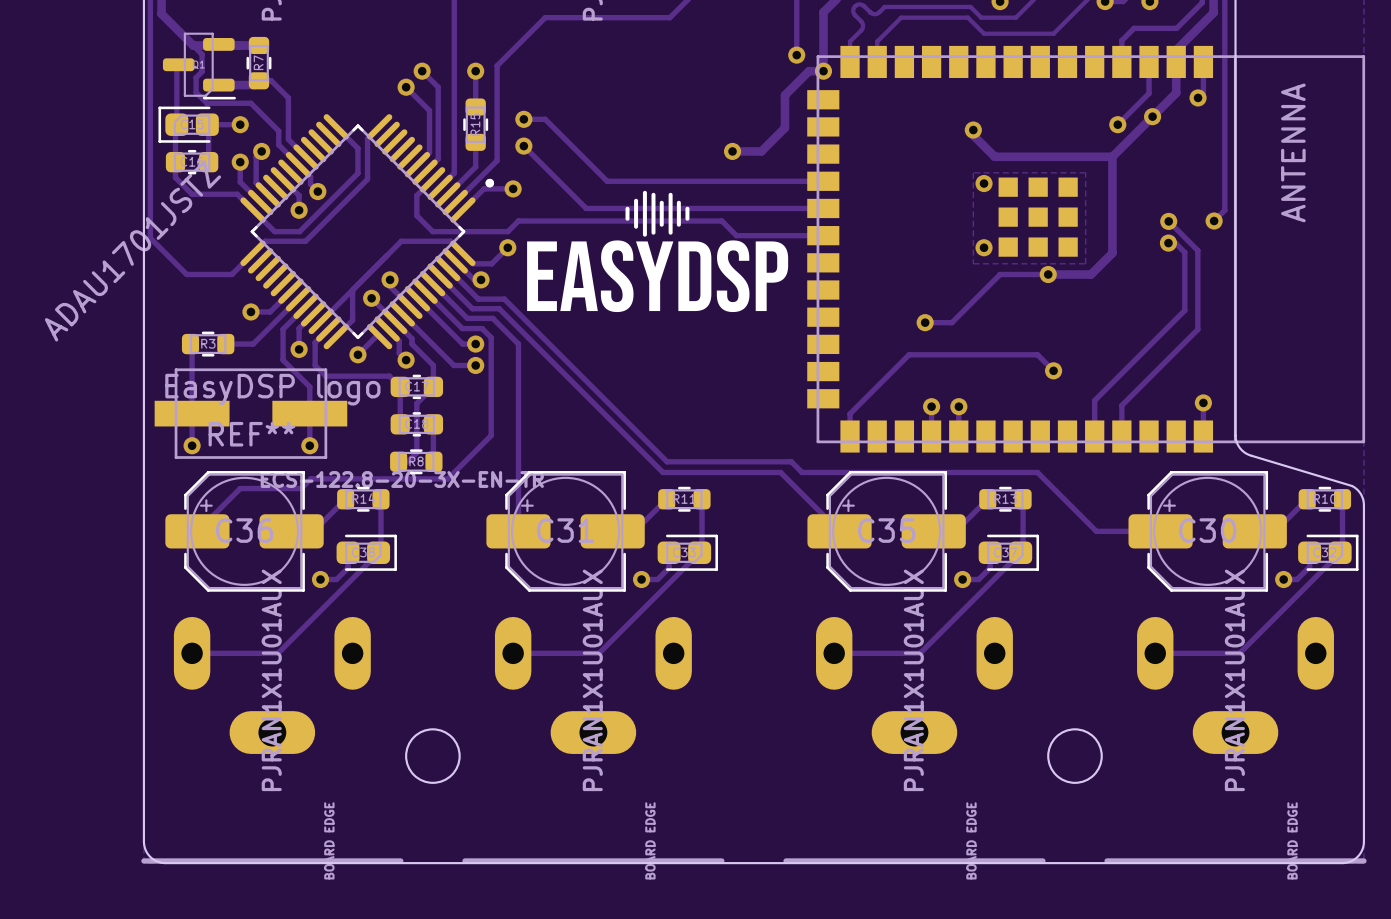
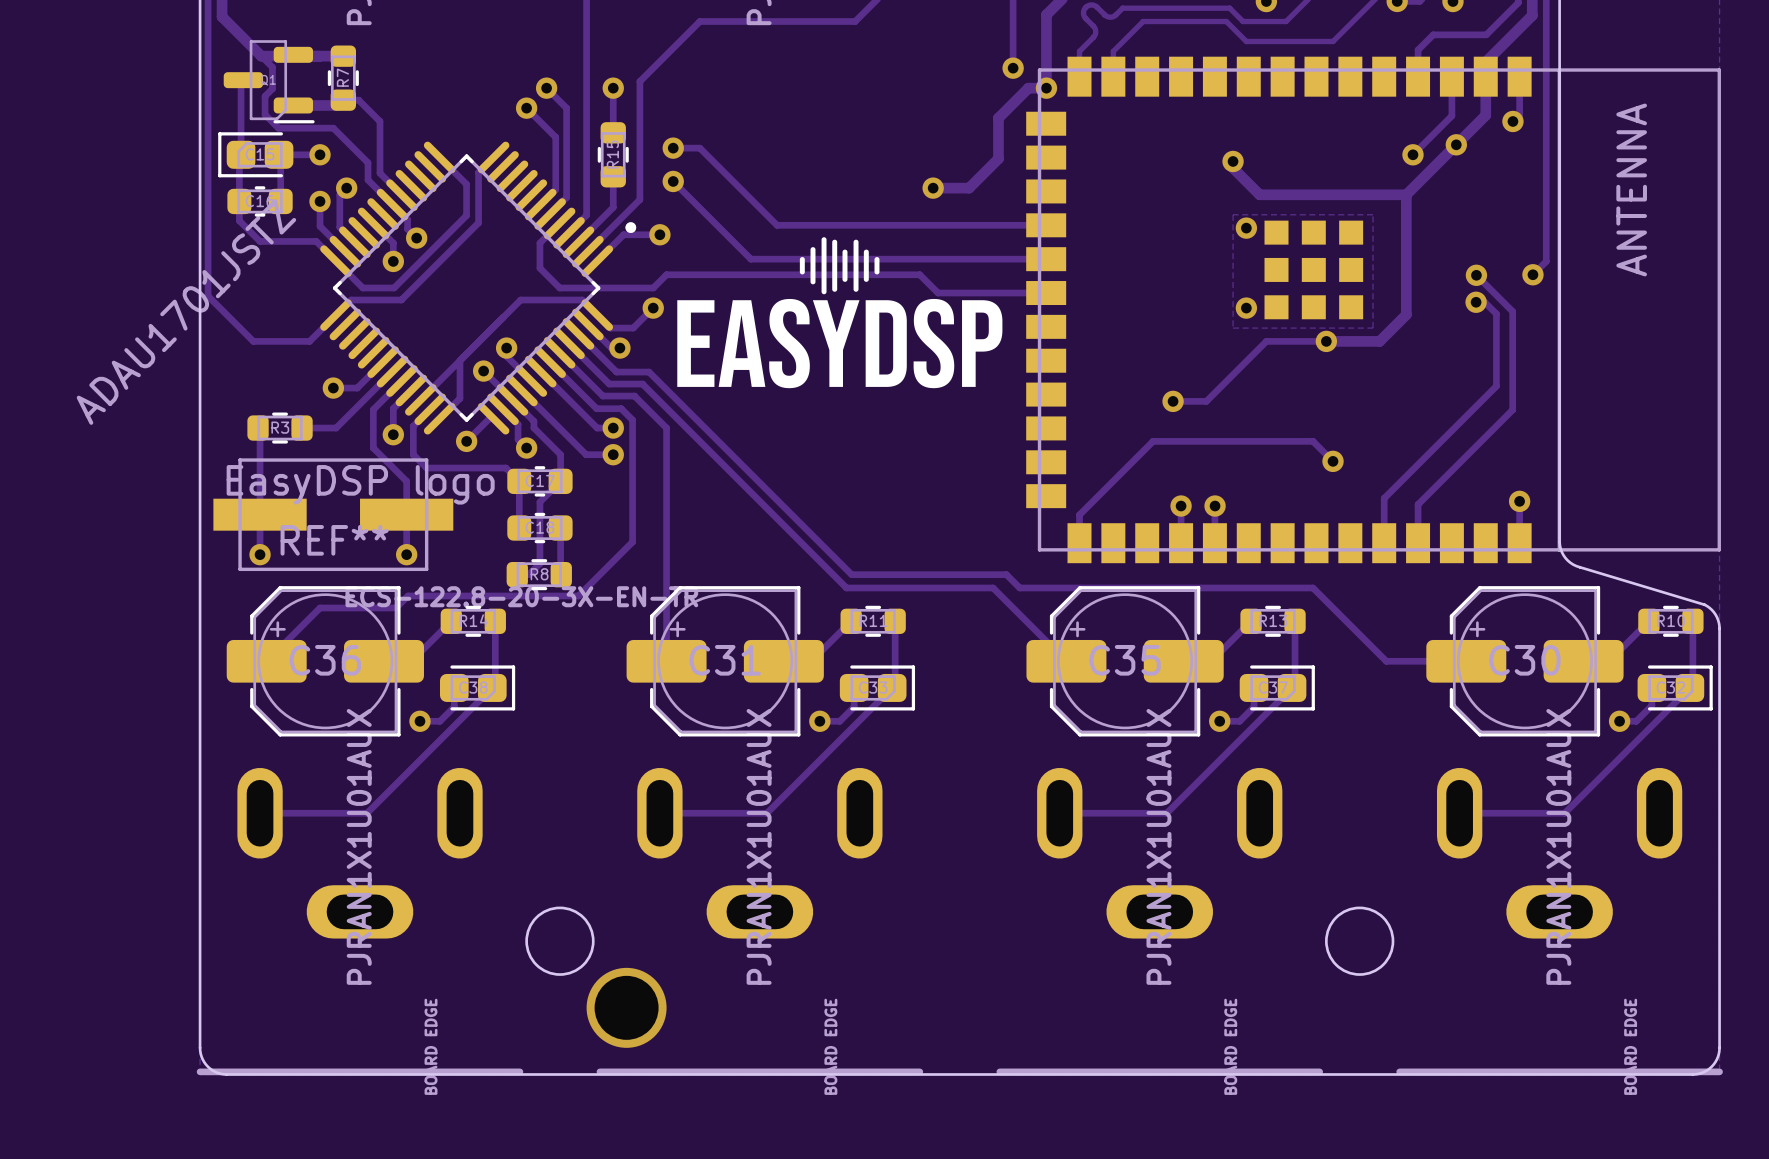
part footprint: [141, 616, 404, 864] -> [196, 767, 524, 1076]
part footprint: [462, 616, 725, 864] -> [596, 767, 924, 1076]
part footprint: [783, 616, 1046, 864] -> [996, 767, 1324, 1076]
part footprint: [1104, 616, 1367, 864] -> [1396, 767, 1723, 1076]
via: none -> (626, 1007)

